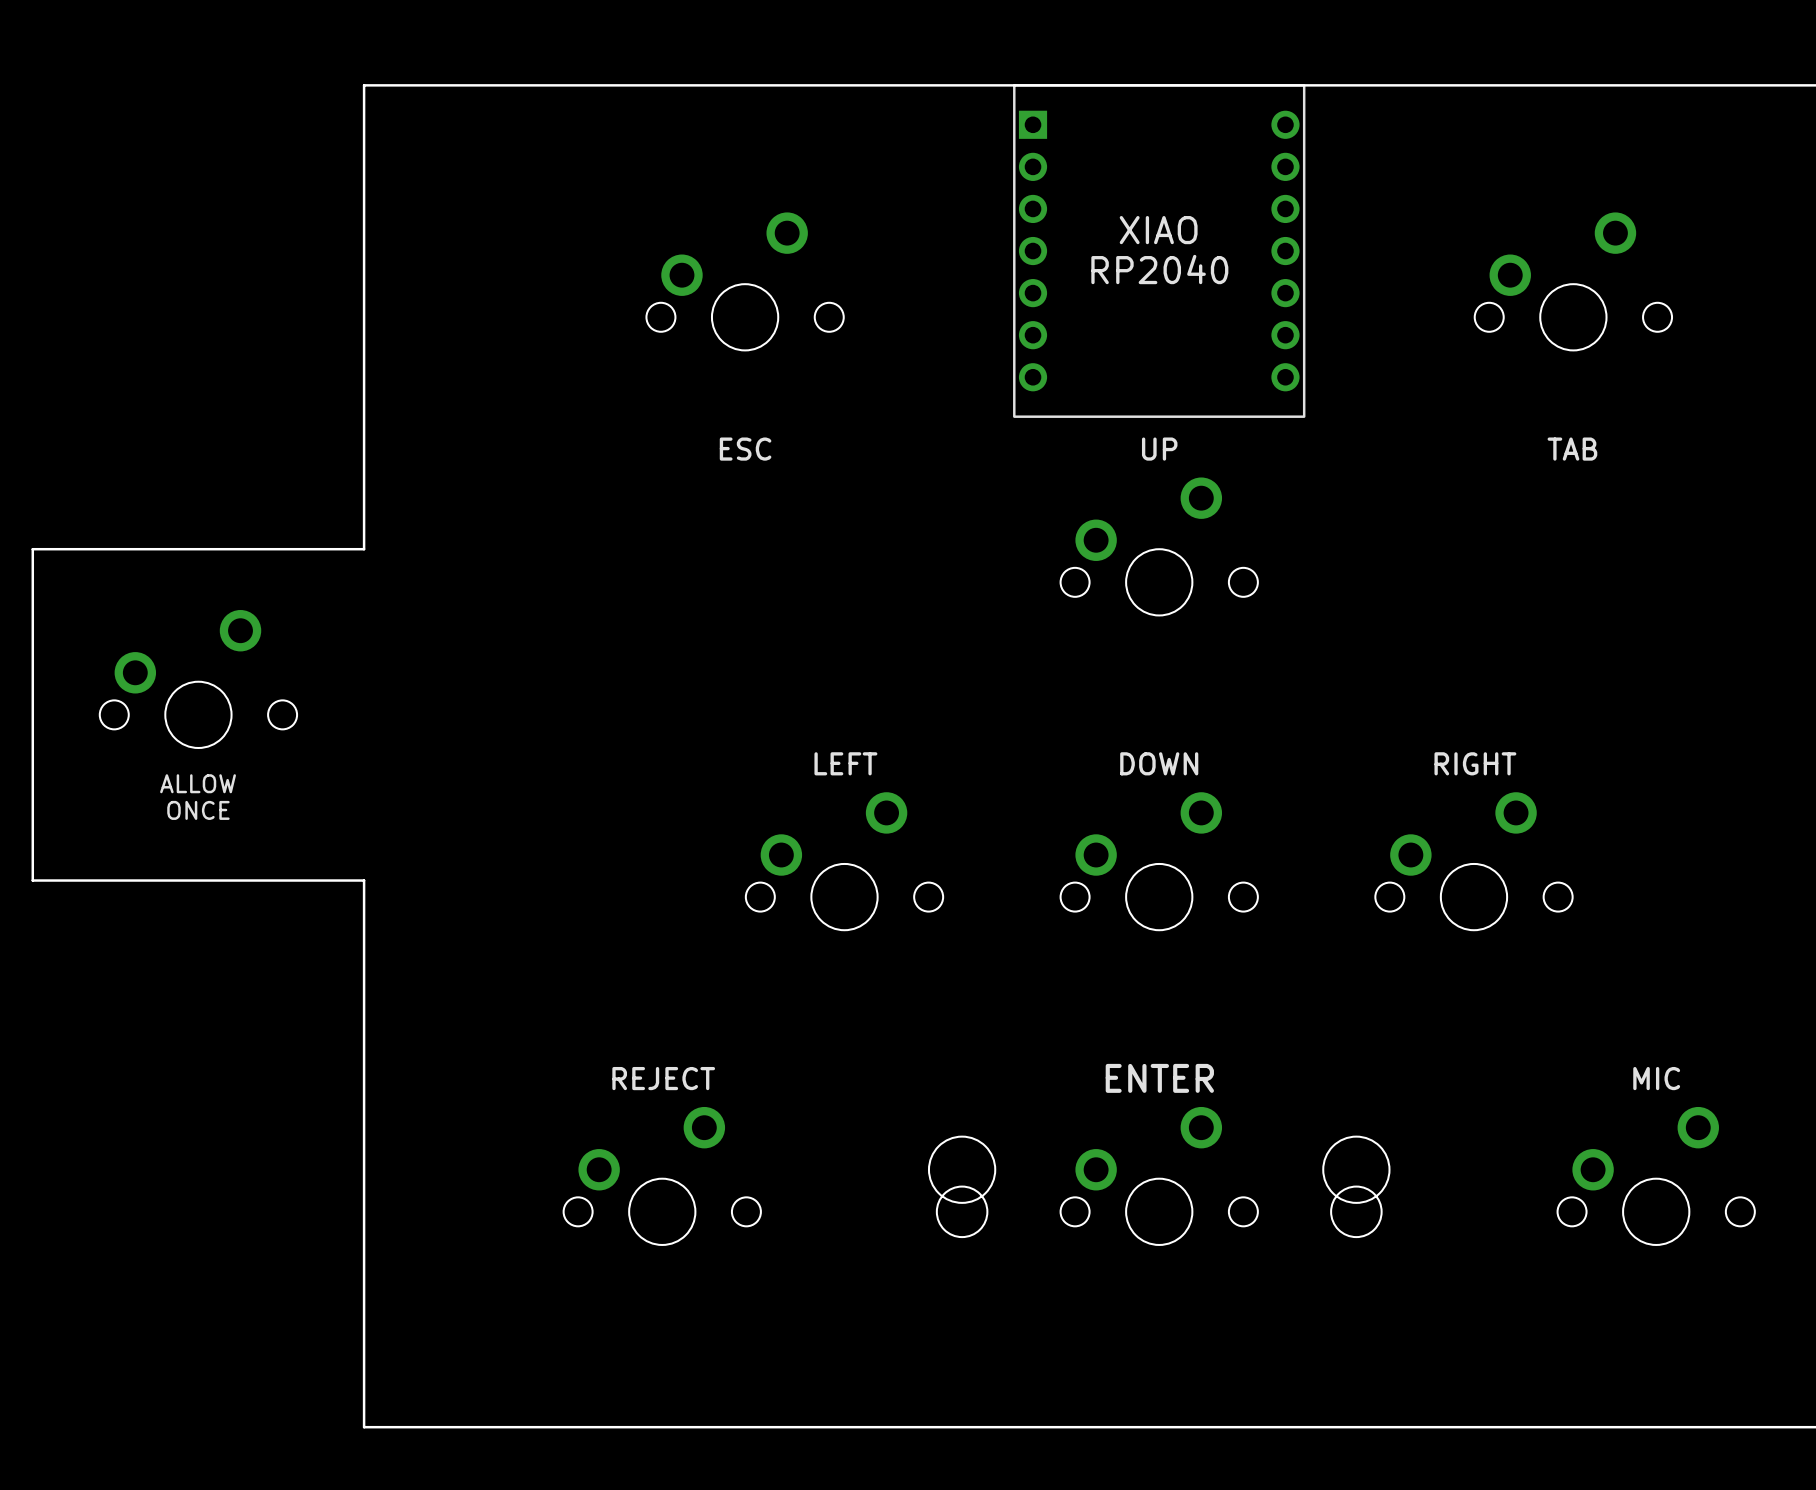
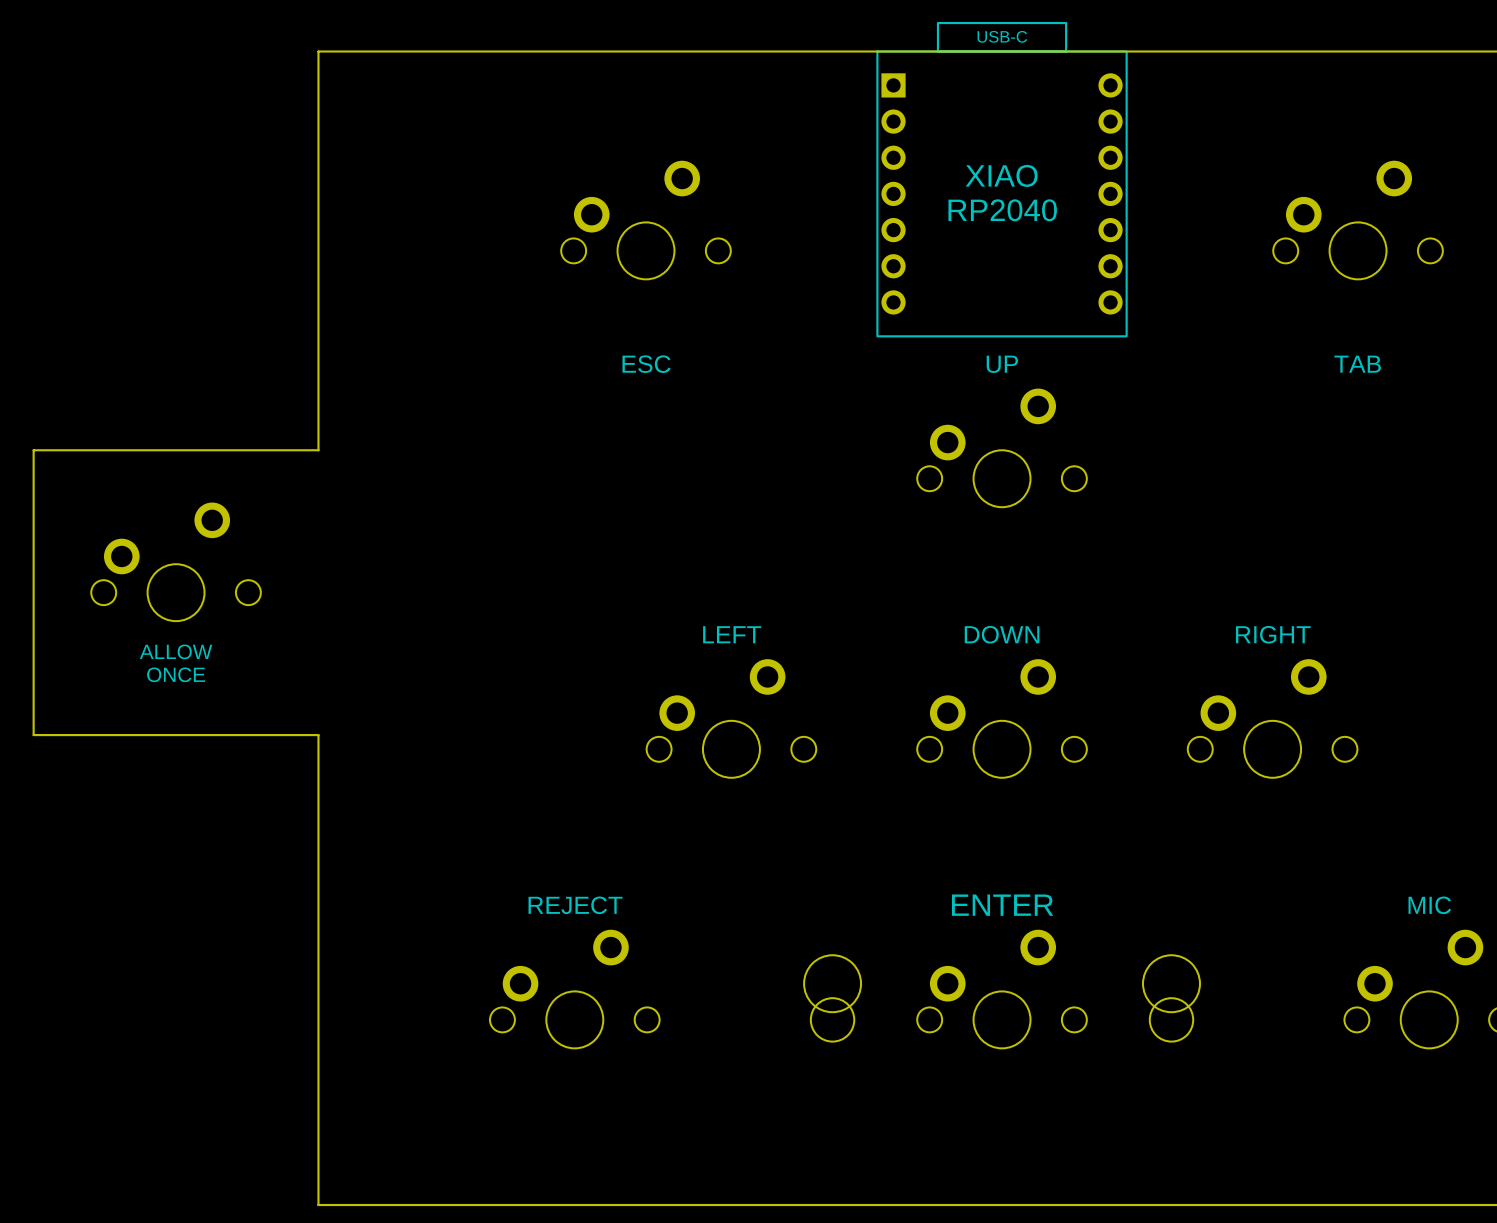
part footprint: [1013, 84, 1306, 418] -> [876, 21, 1128, 338]

